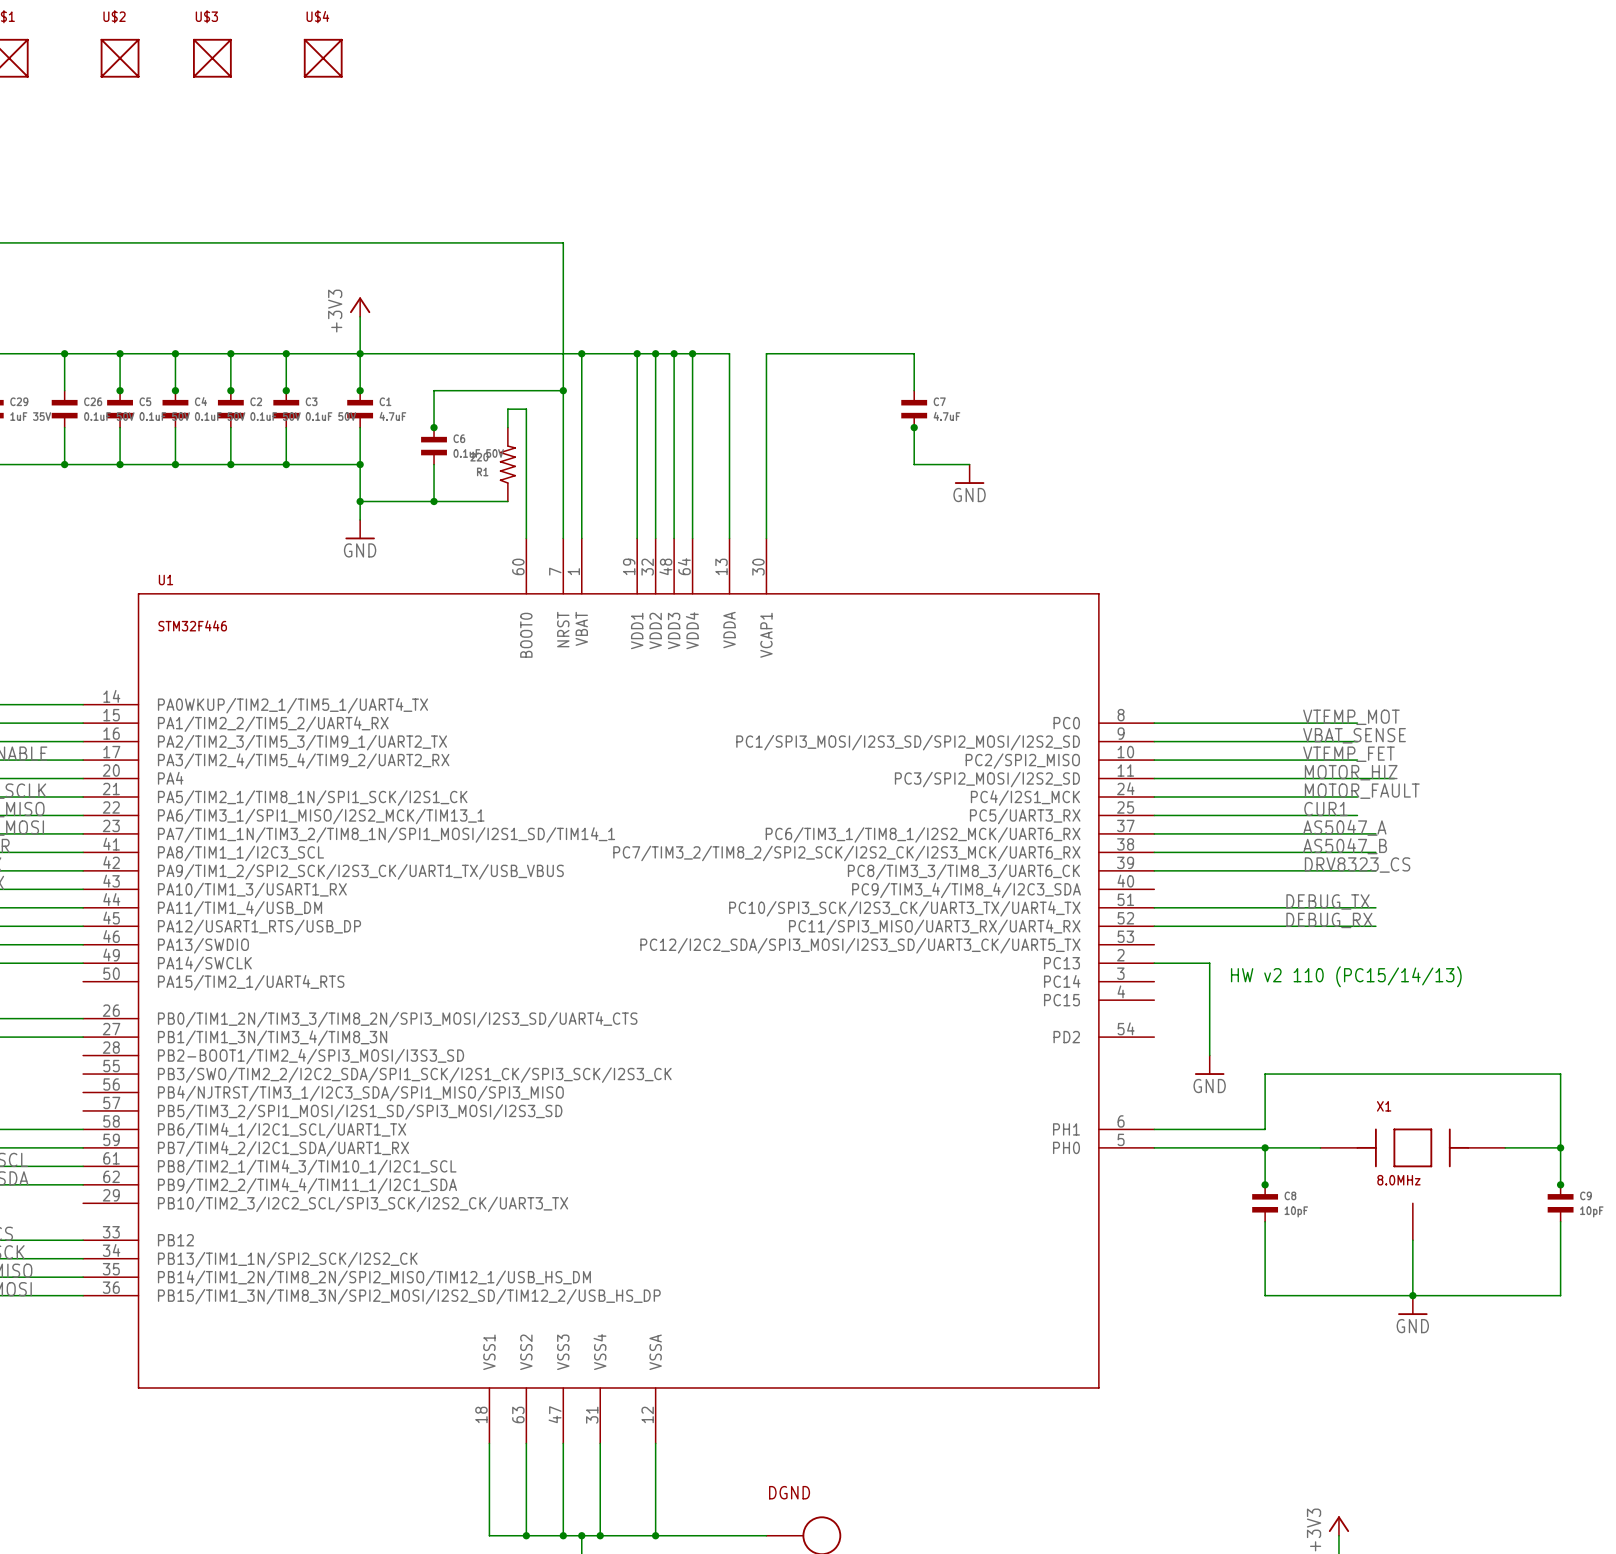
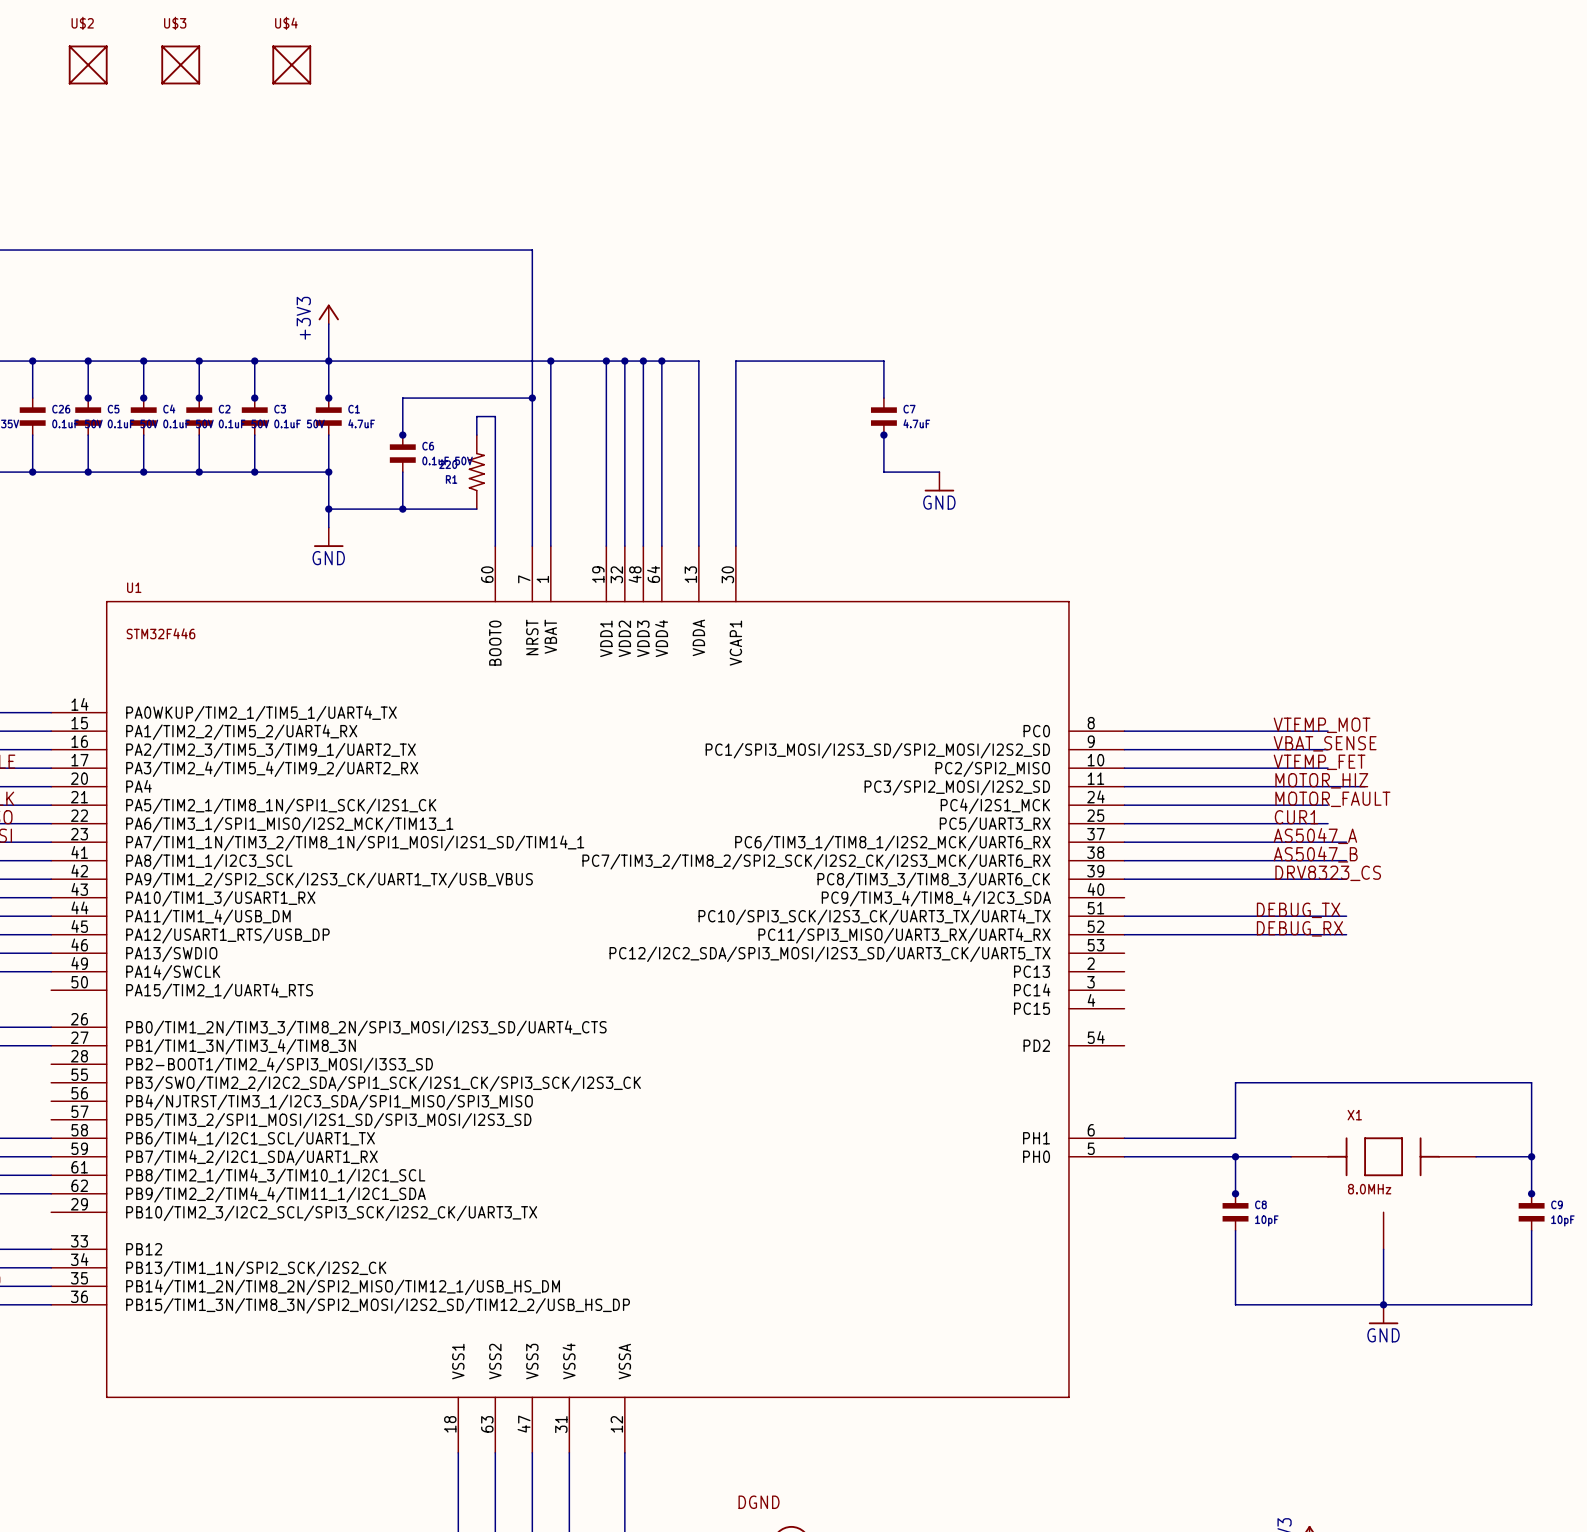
wire: (1154, 963) (1209, 963) (1209, 1055) -> none
text: HW v2 110 (PC15/14/13) (1346, 976) -> none
power symbol: GND (1209, 1065) -> none

